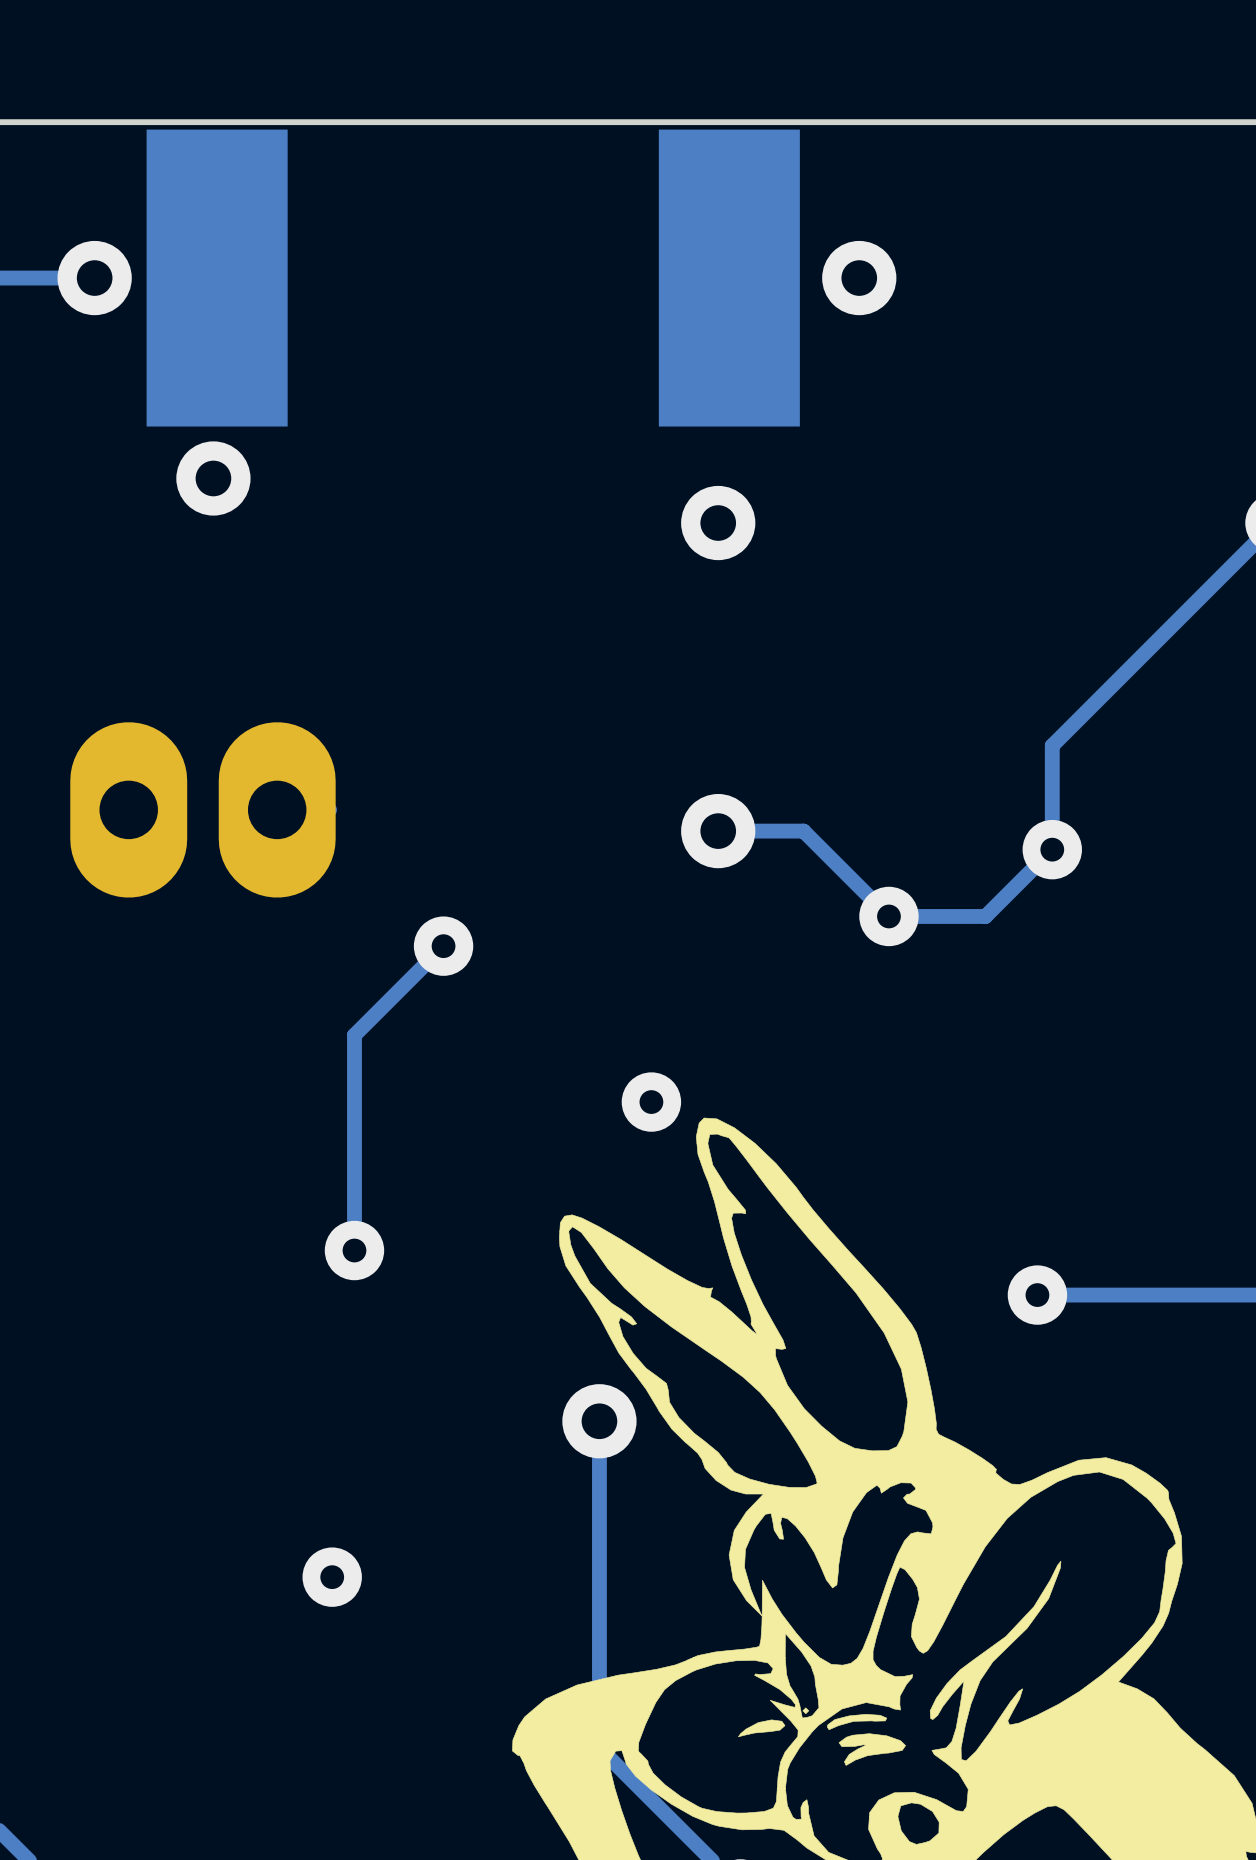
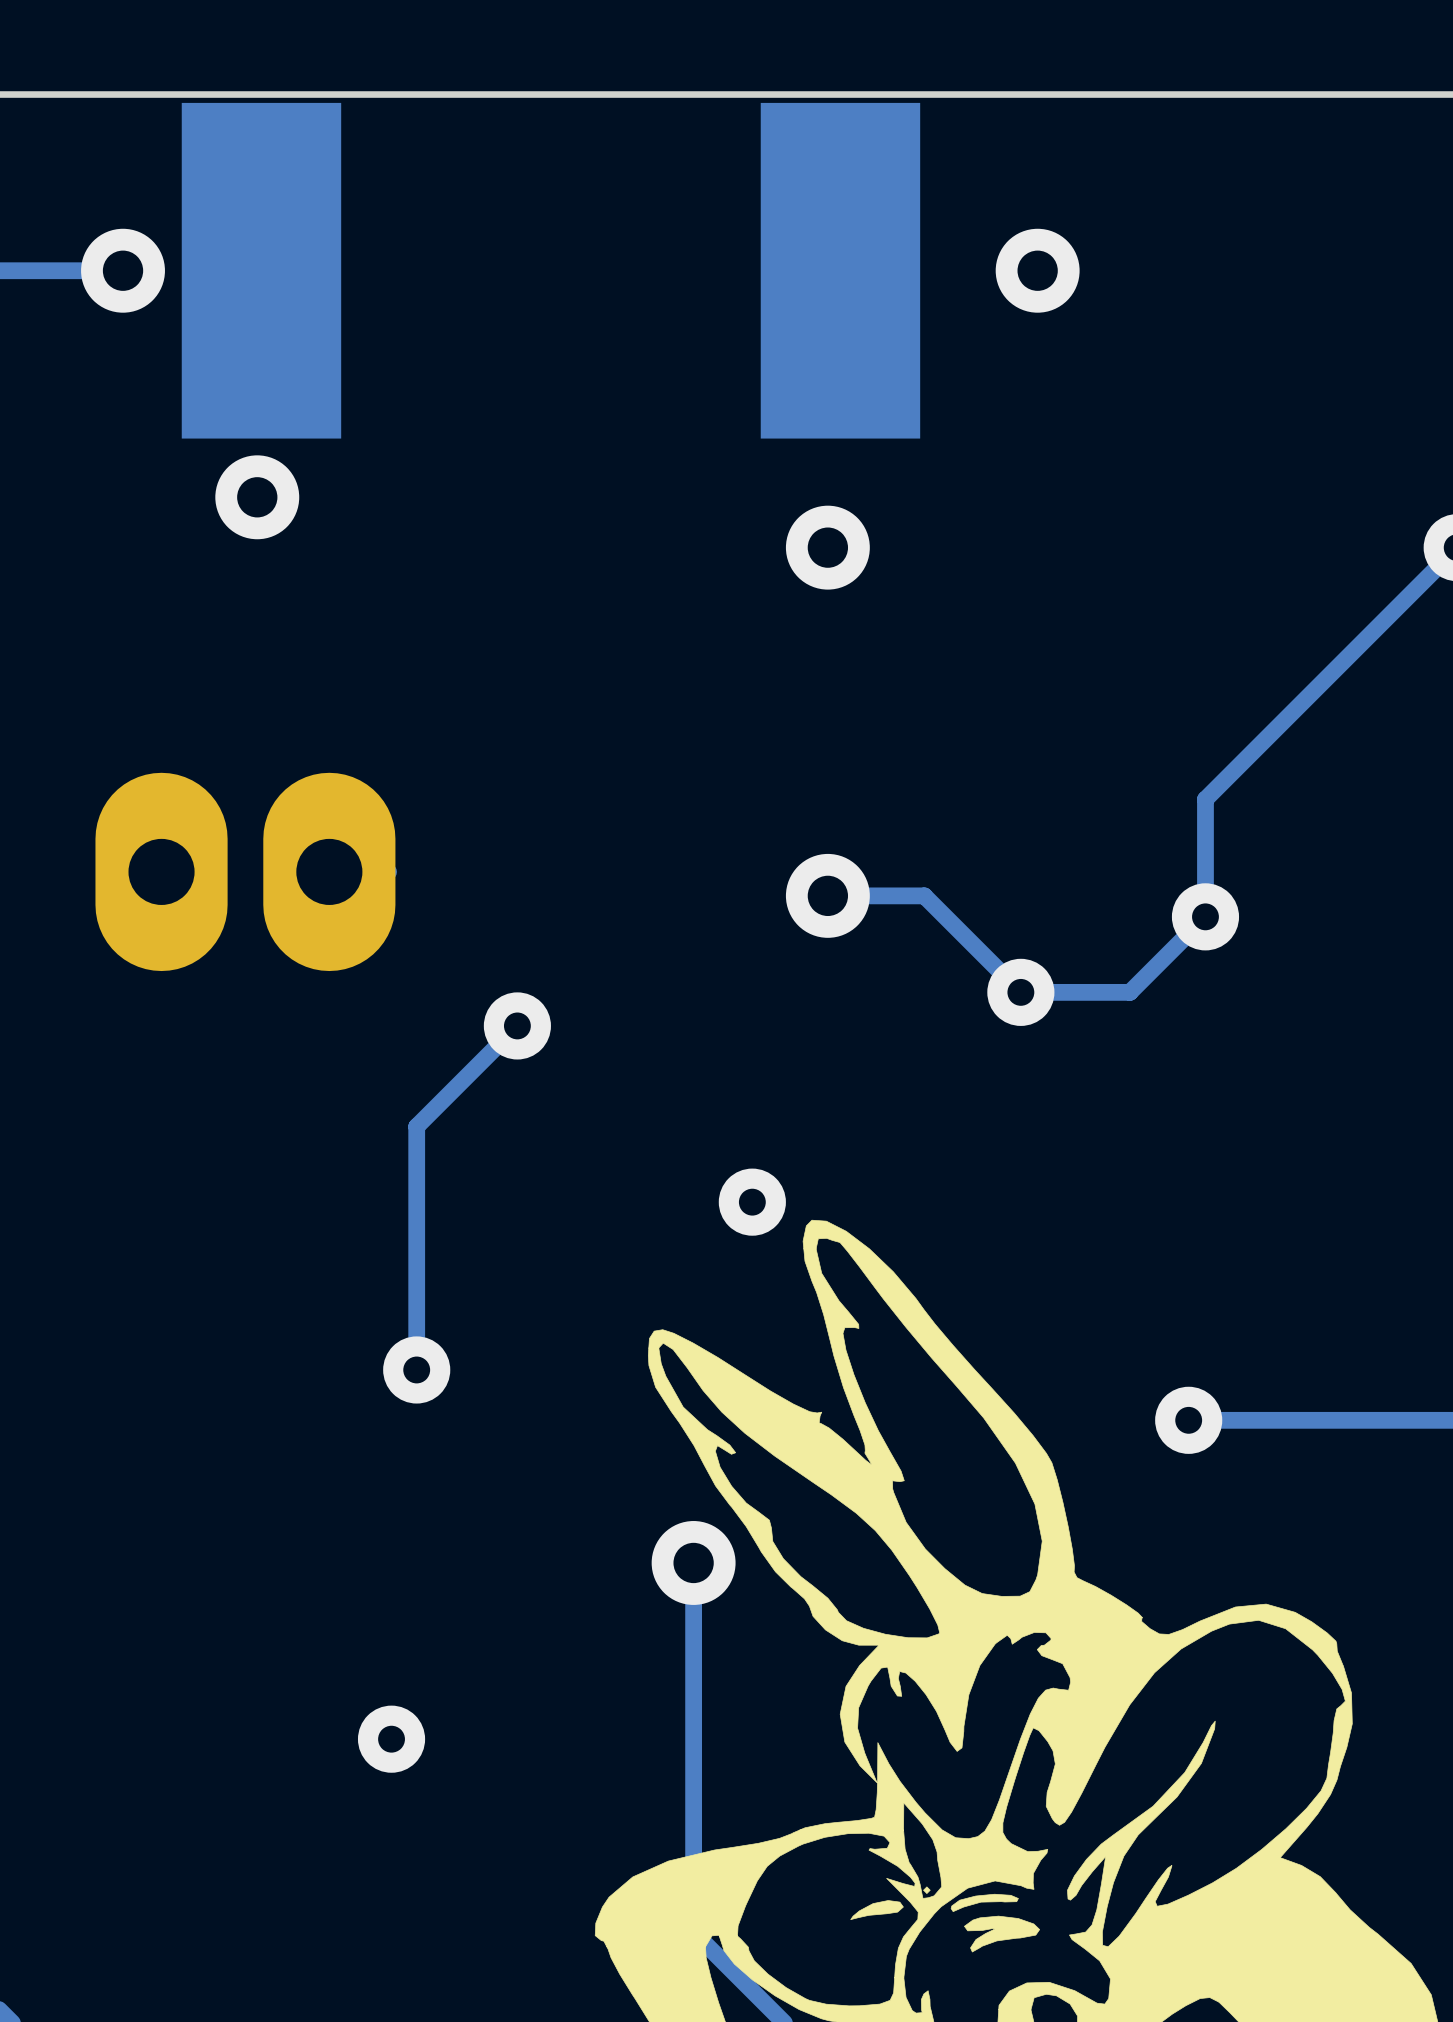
via position: (859, 278) -> (1037, 270)

